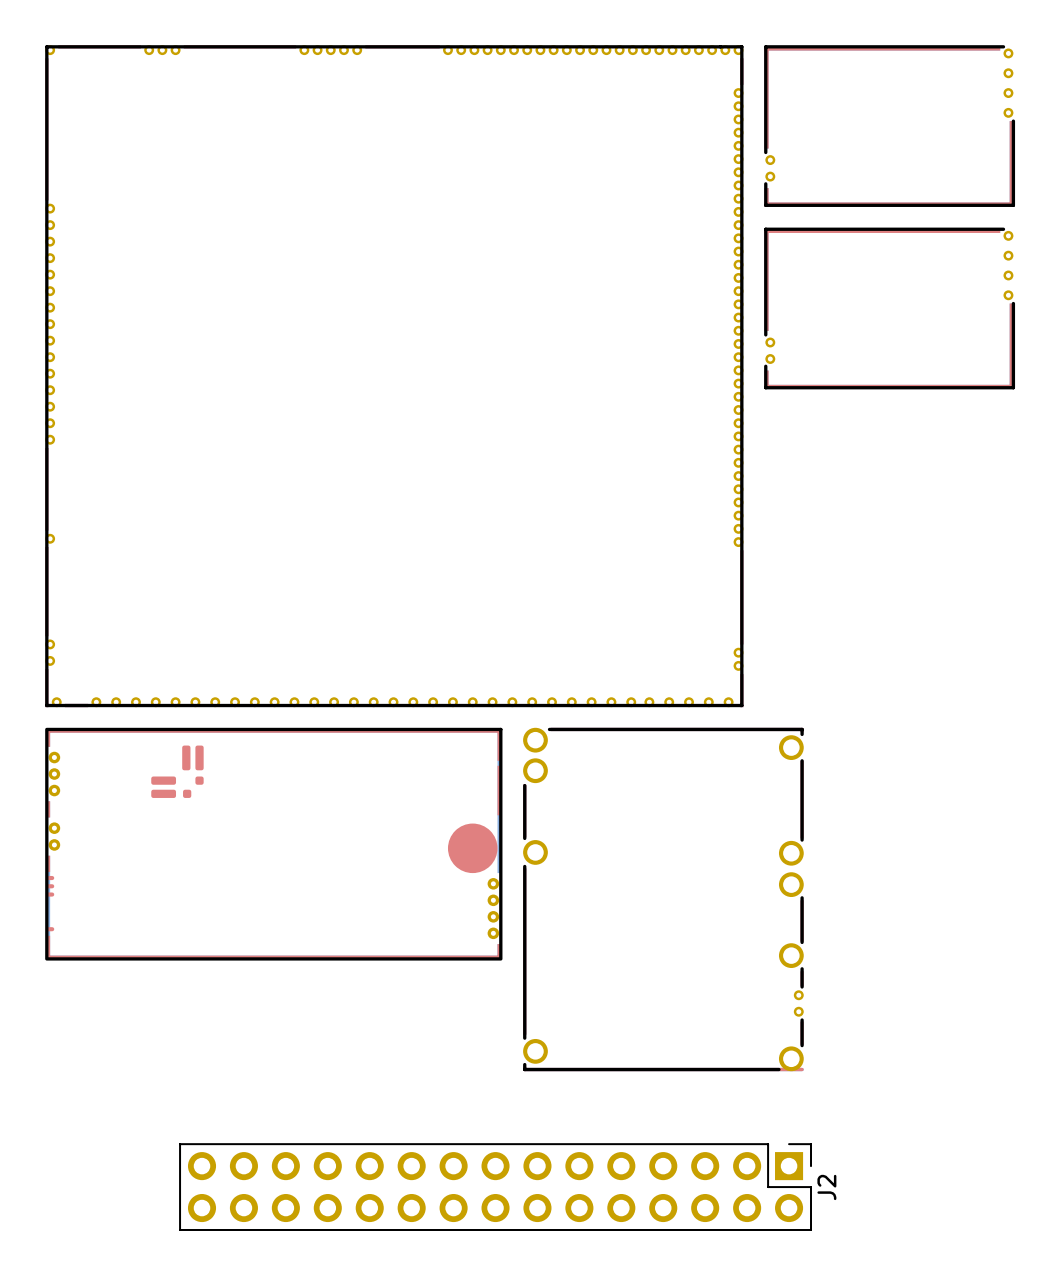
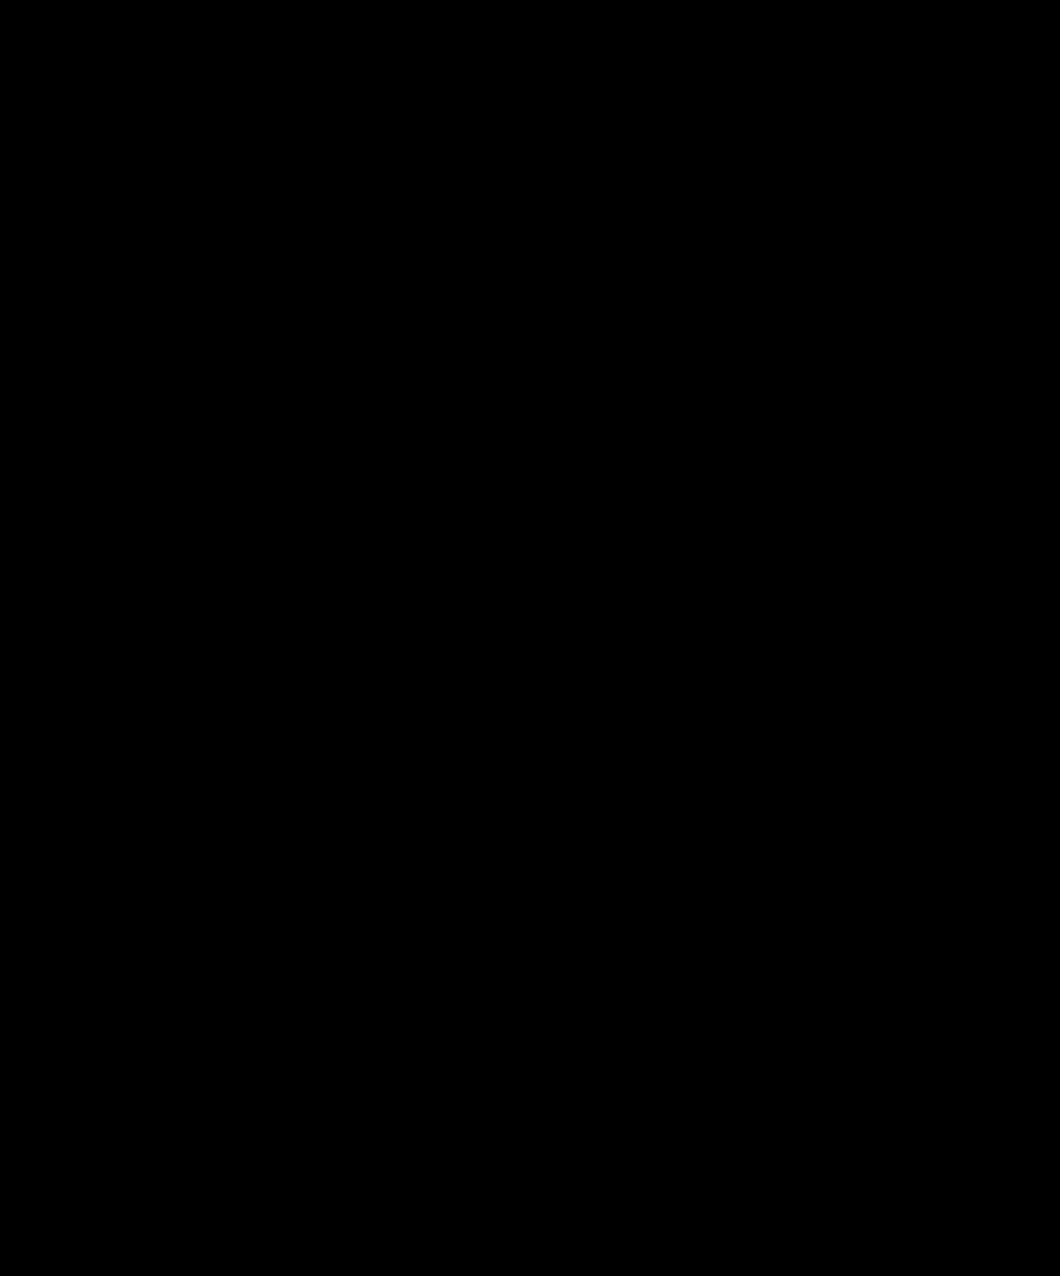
part: (889, 126) -> none
part: (889, 308) -> none
part: (394, 376) -> none
part: (273, 844) -> none
part: (663, 899) -> none
J2: (495, 1187) -> none

